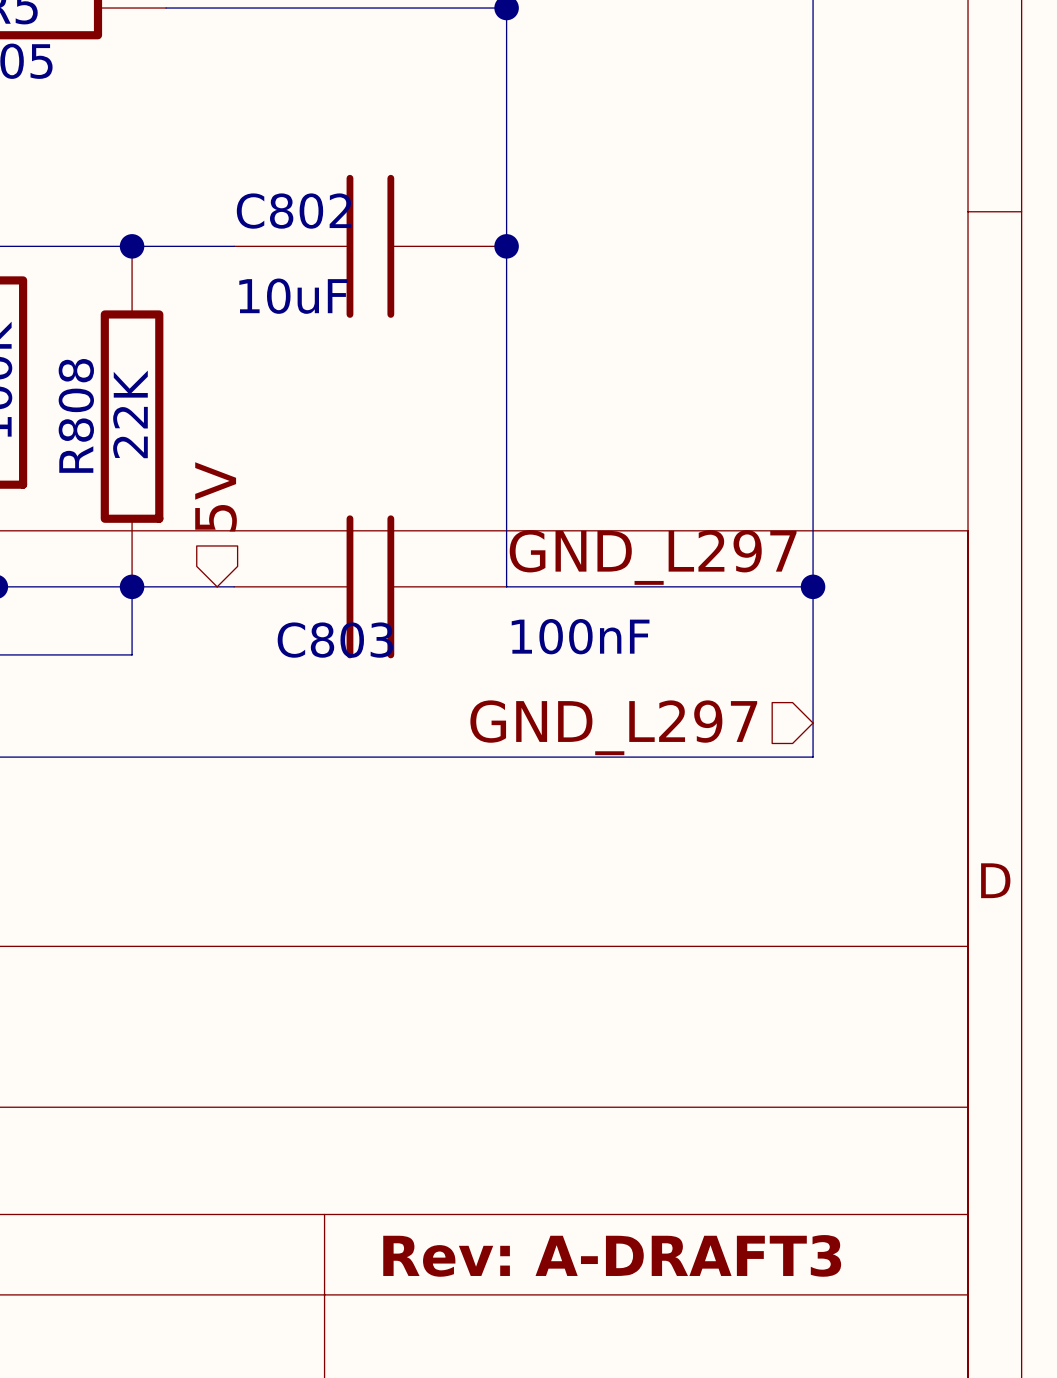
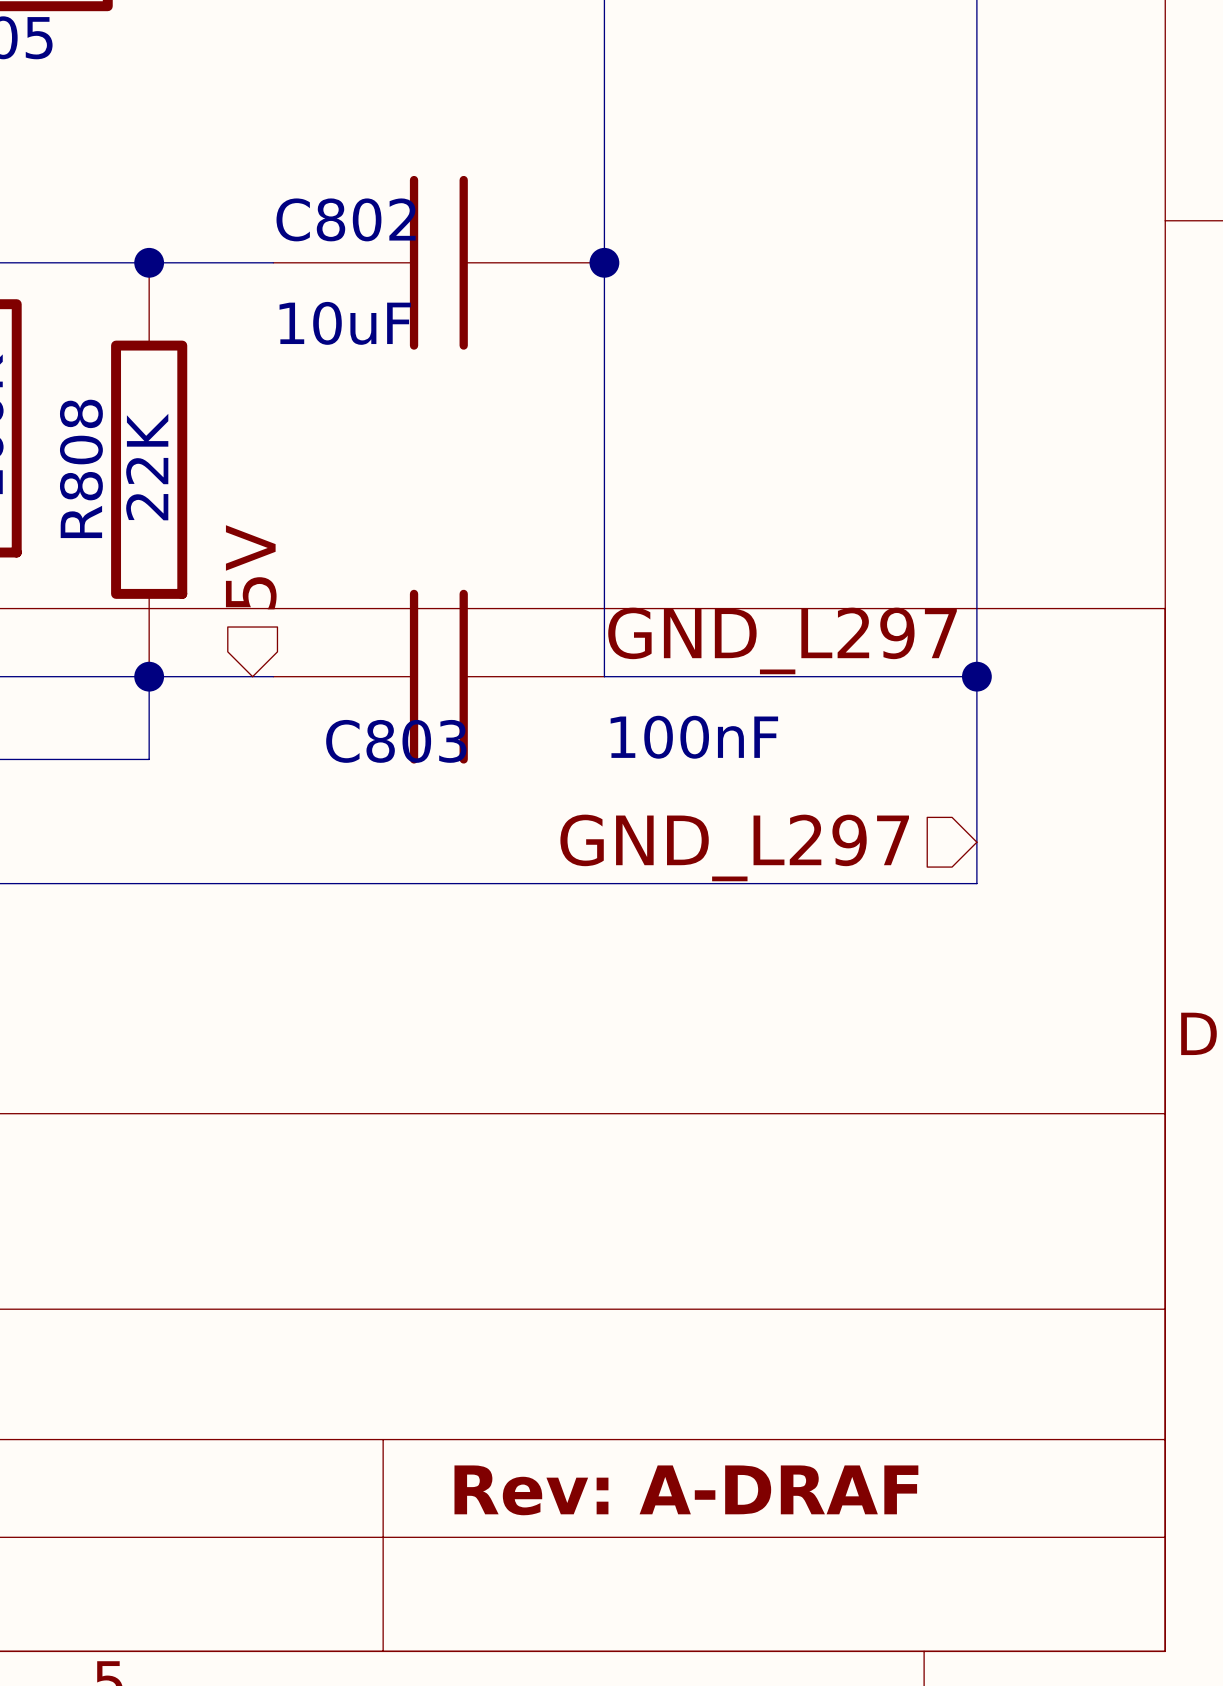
title block: Rev: A-DRAFT3 (612, 1255) -> Rev: A-DRAF (686, 1490)

